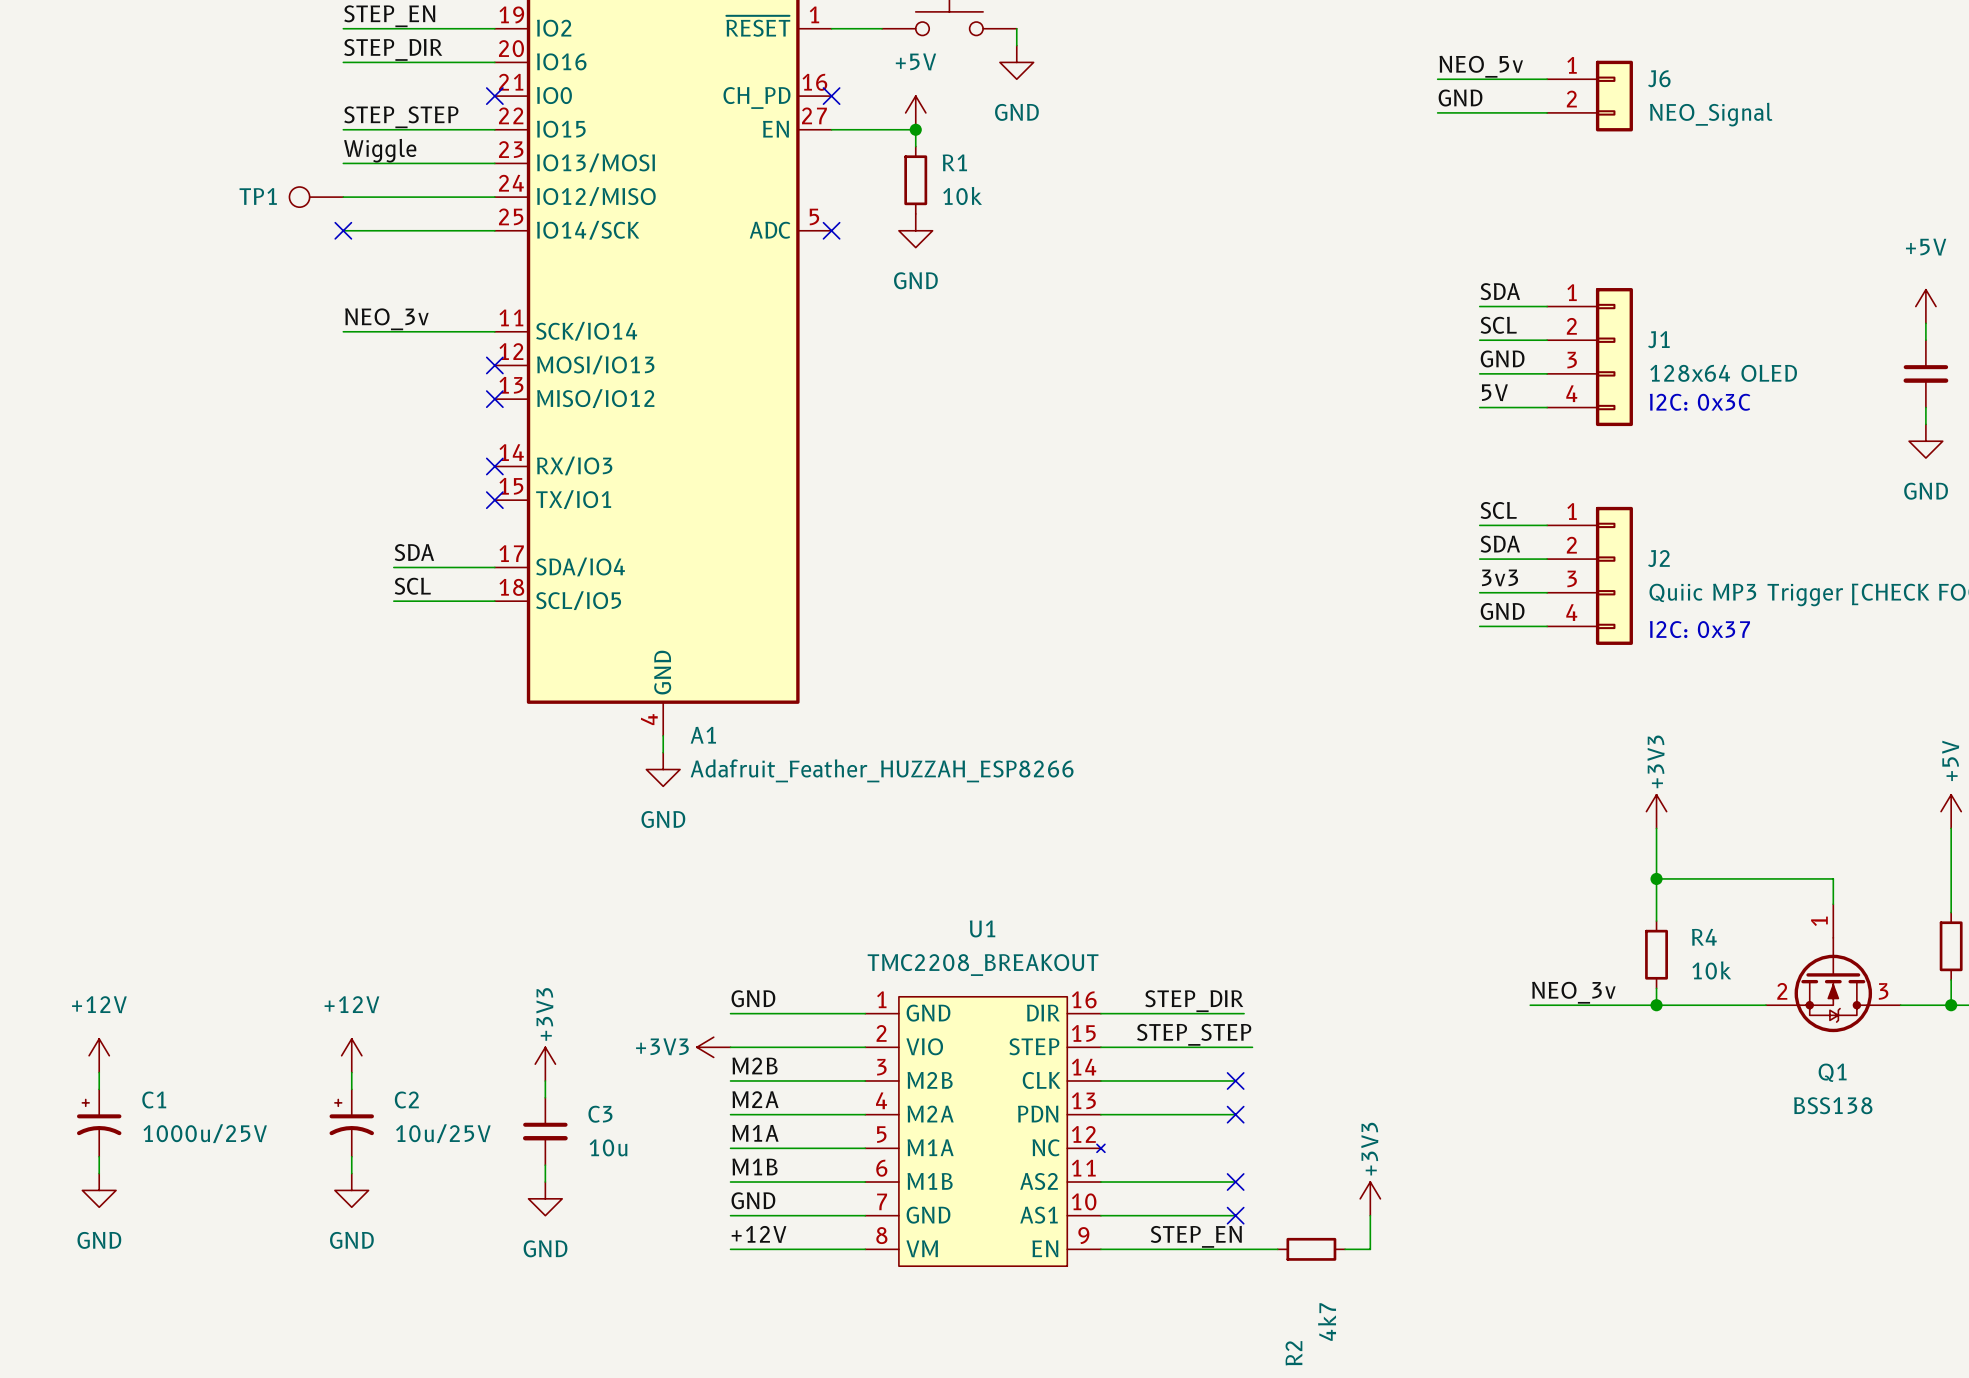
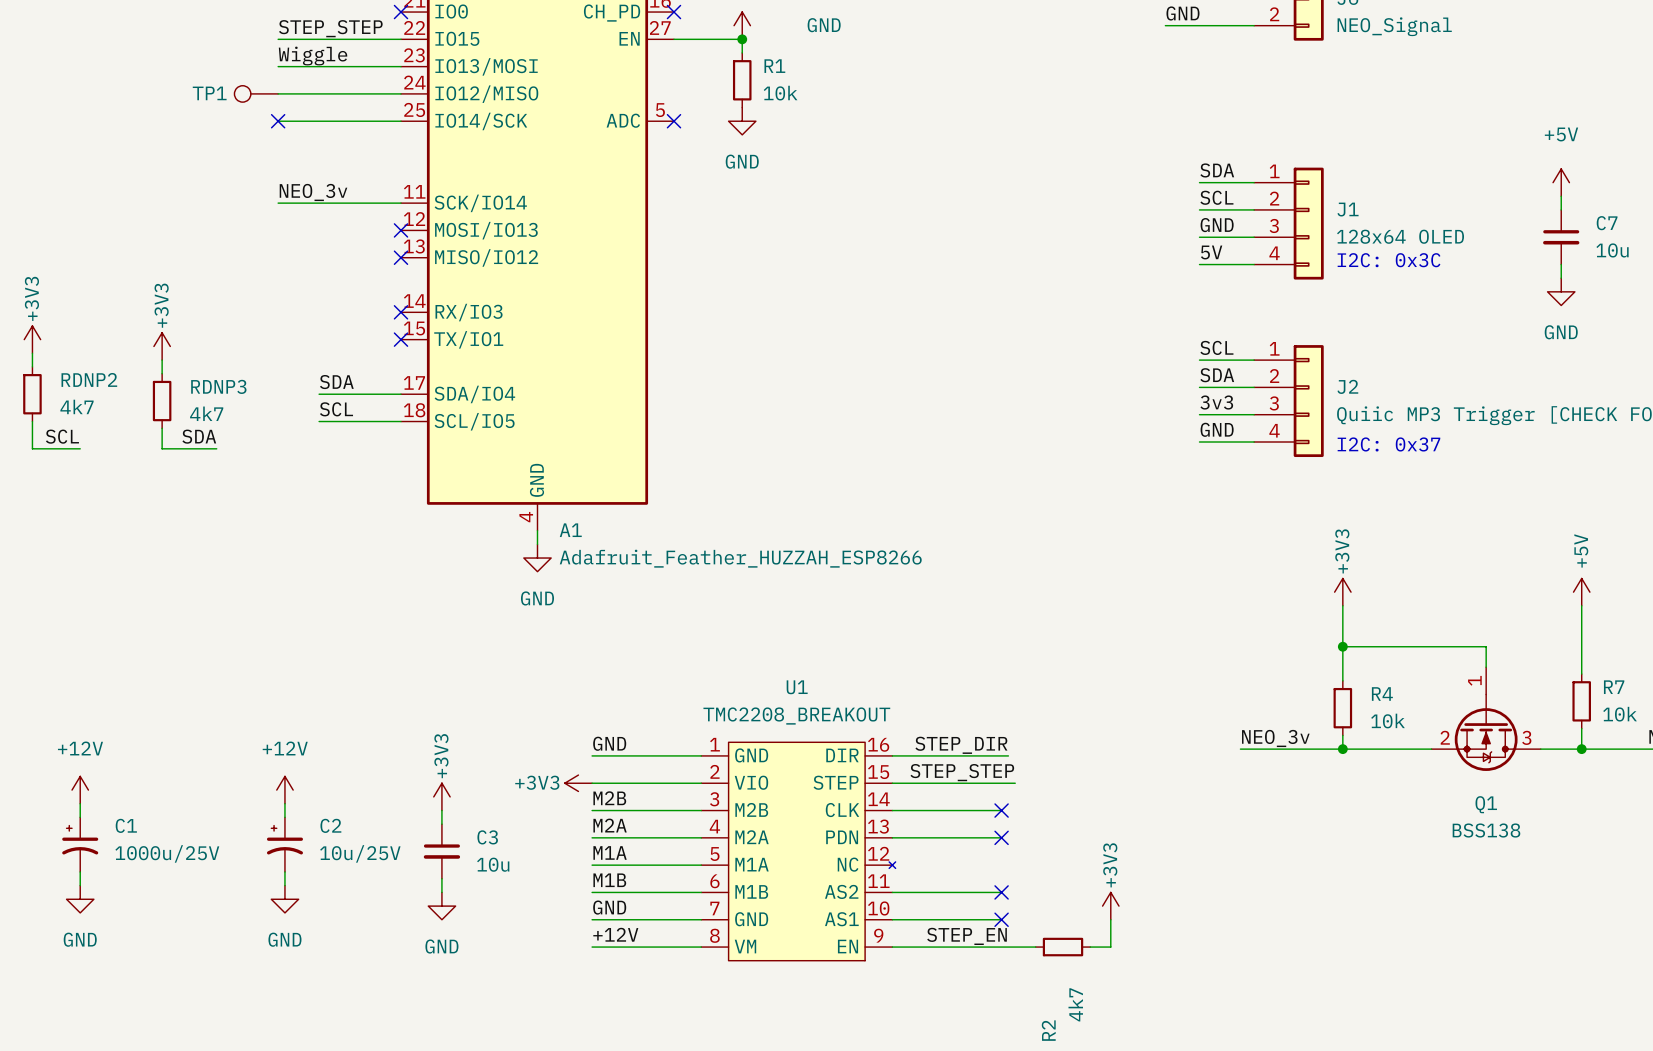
power symbol: none -> +3V3 (32, 339)
power symbol: none -> +3V3 (162, 346)
wire: none -> (32, 353) (32, 366)
wire: none -> (162, 360) (162, 373)
RDNP2: none -> 4k7 (32, 394)
RDNP3: none -> 4k7 (162, 401)
wire: none -> (32, 421) (32, 448) (80, 448)
wire: none -> (162, 428) (162, 448) (216, 448)
label: none -> SCL (62, 436)
label: none -> SDA (199, 436)

